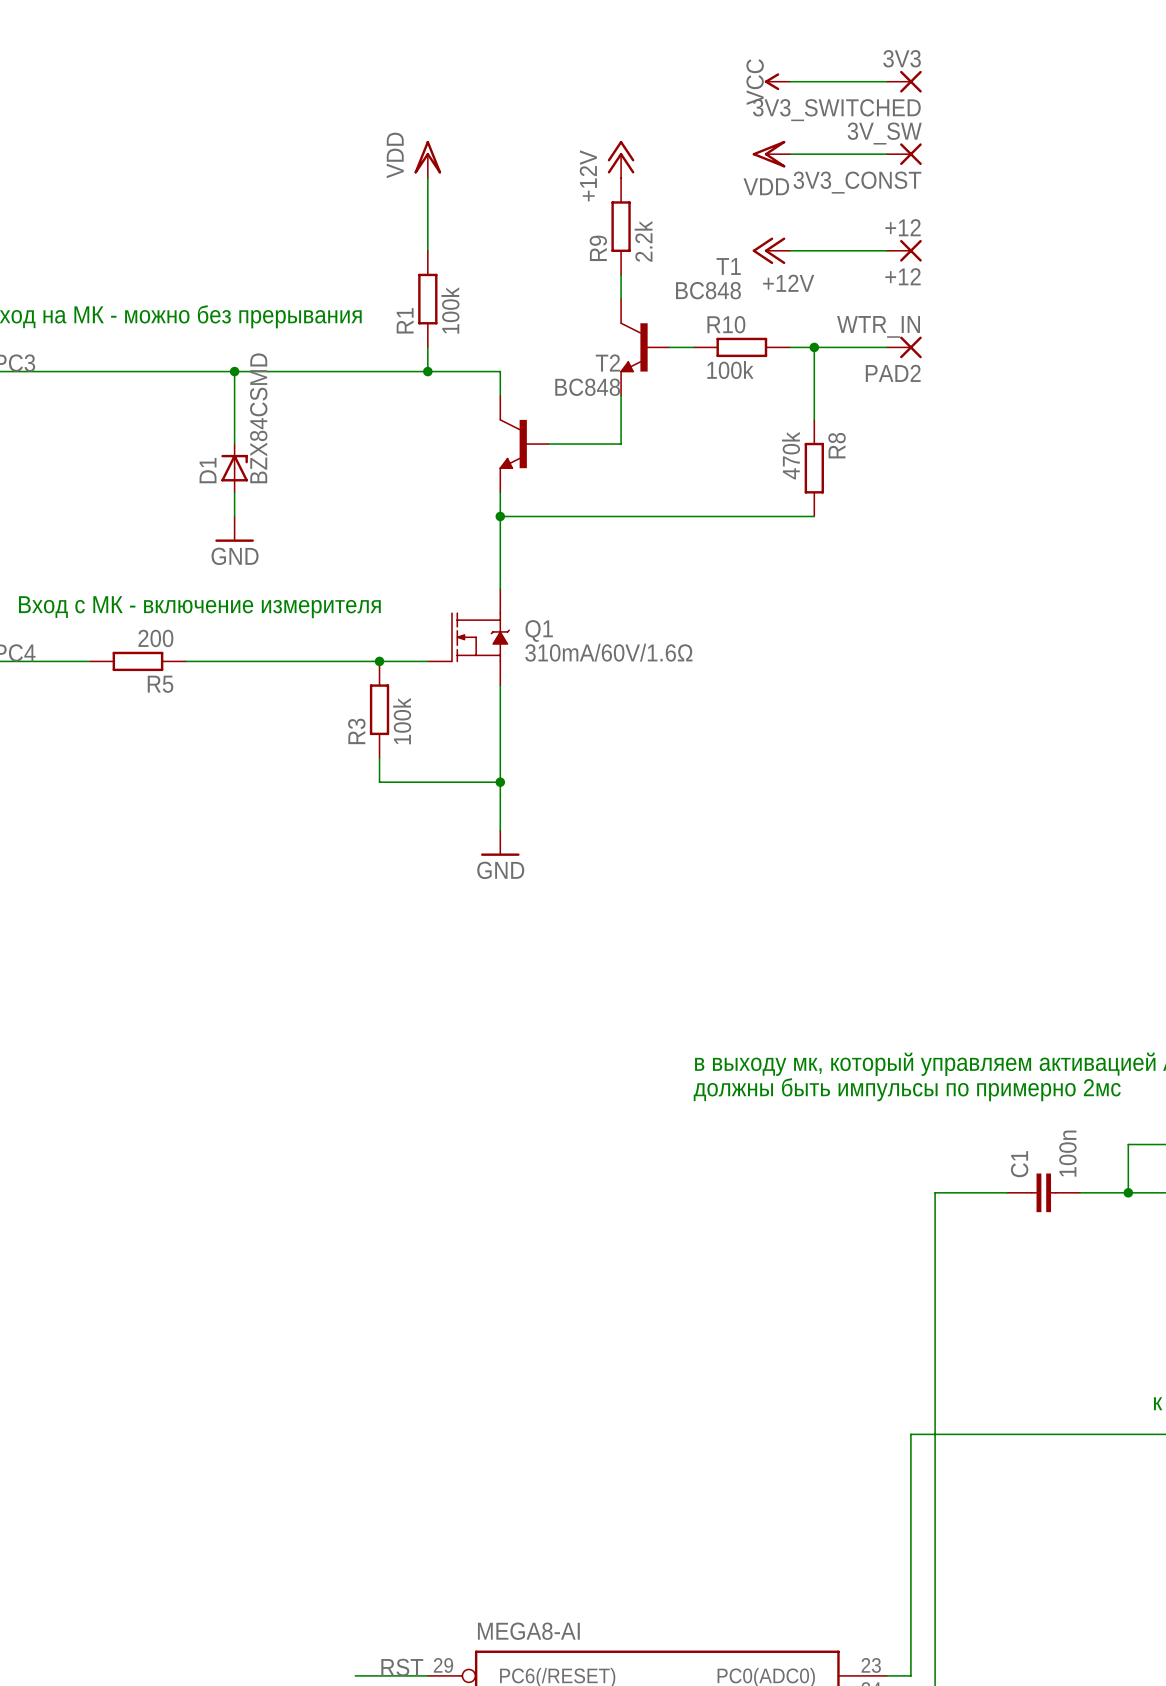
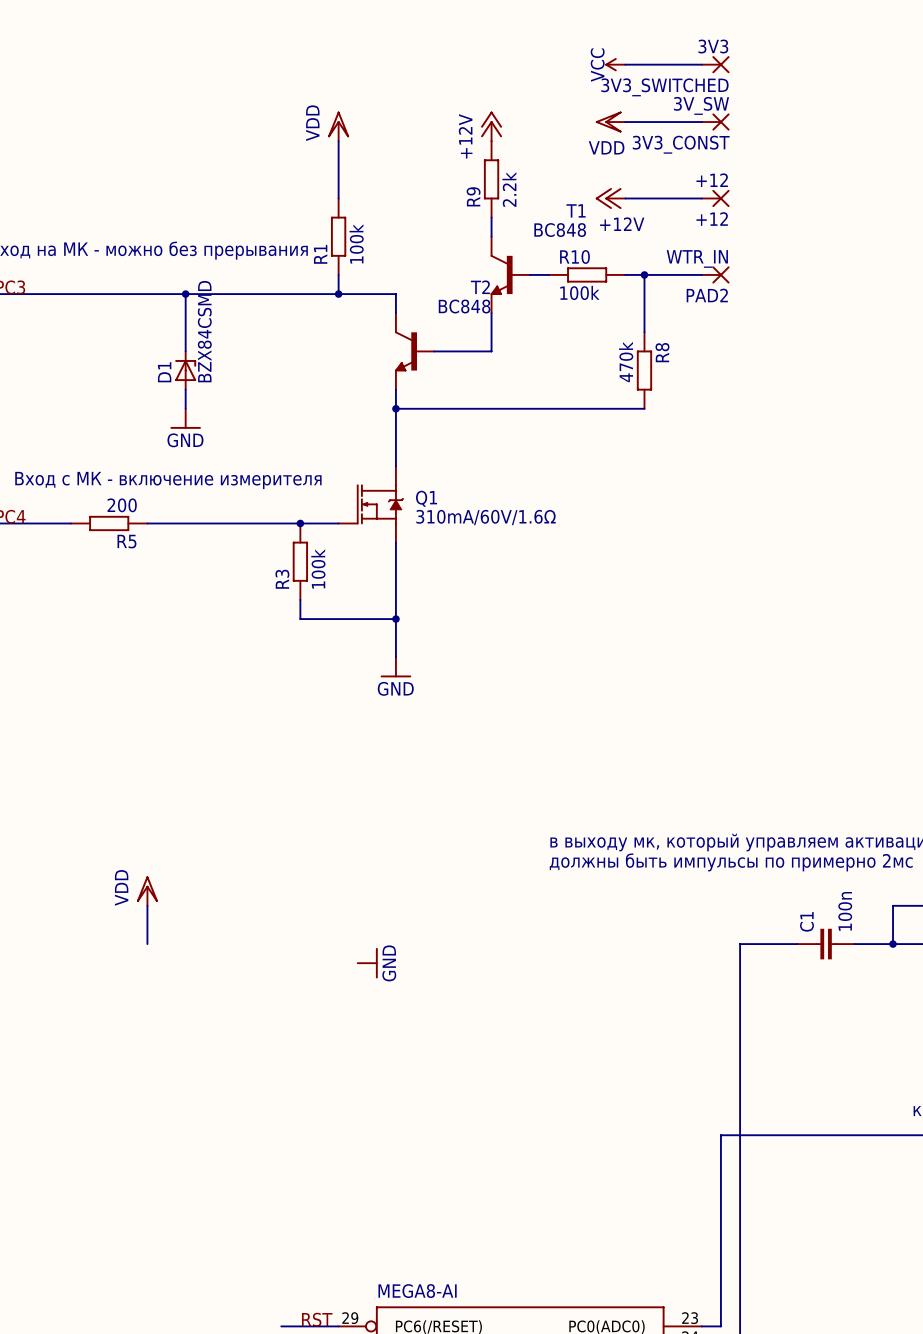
power symbol: none -> VDD (147, 891)
wire: none -> (147, 905) (147, 944)
power symbol: none -> GND (367, 963)

